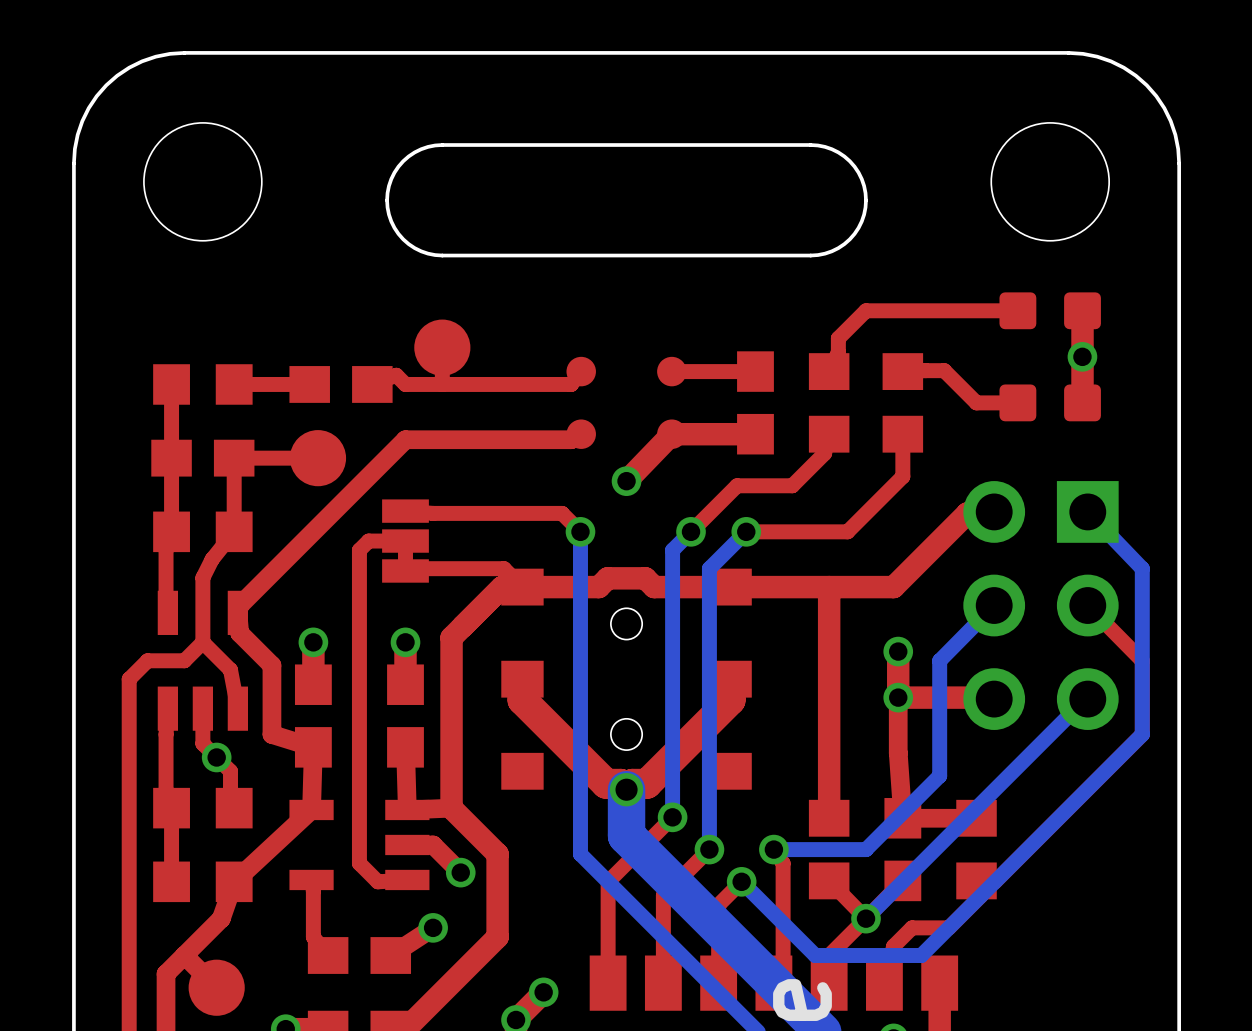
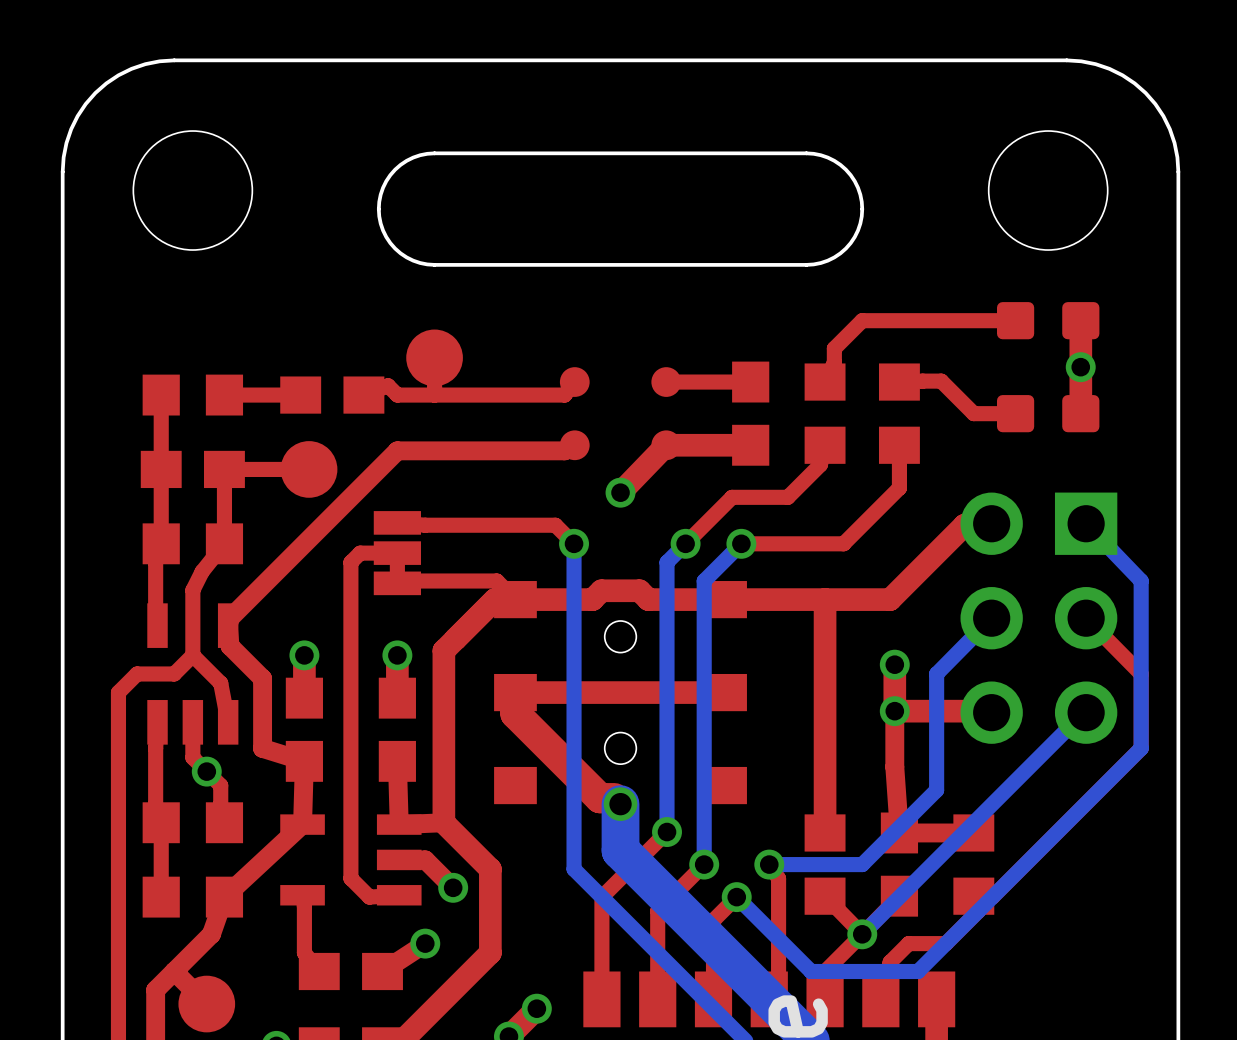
top track: (730, 679) (730, 700) (646, 783) (632, 783) (626, 789) -> (725, 692) (515, 692)

